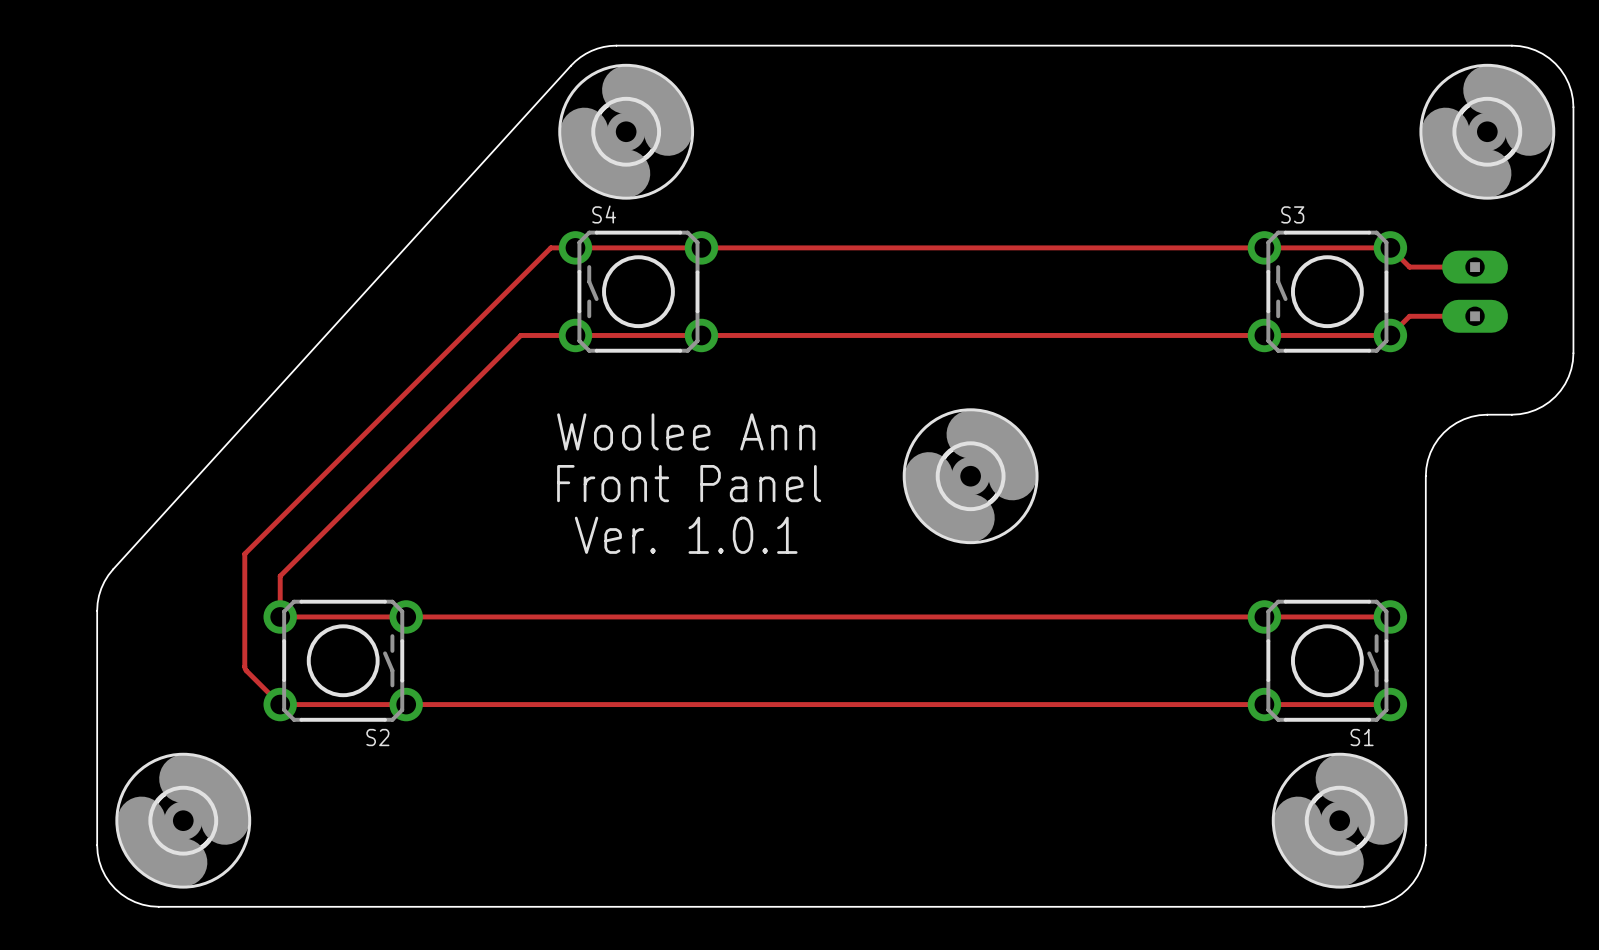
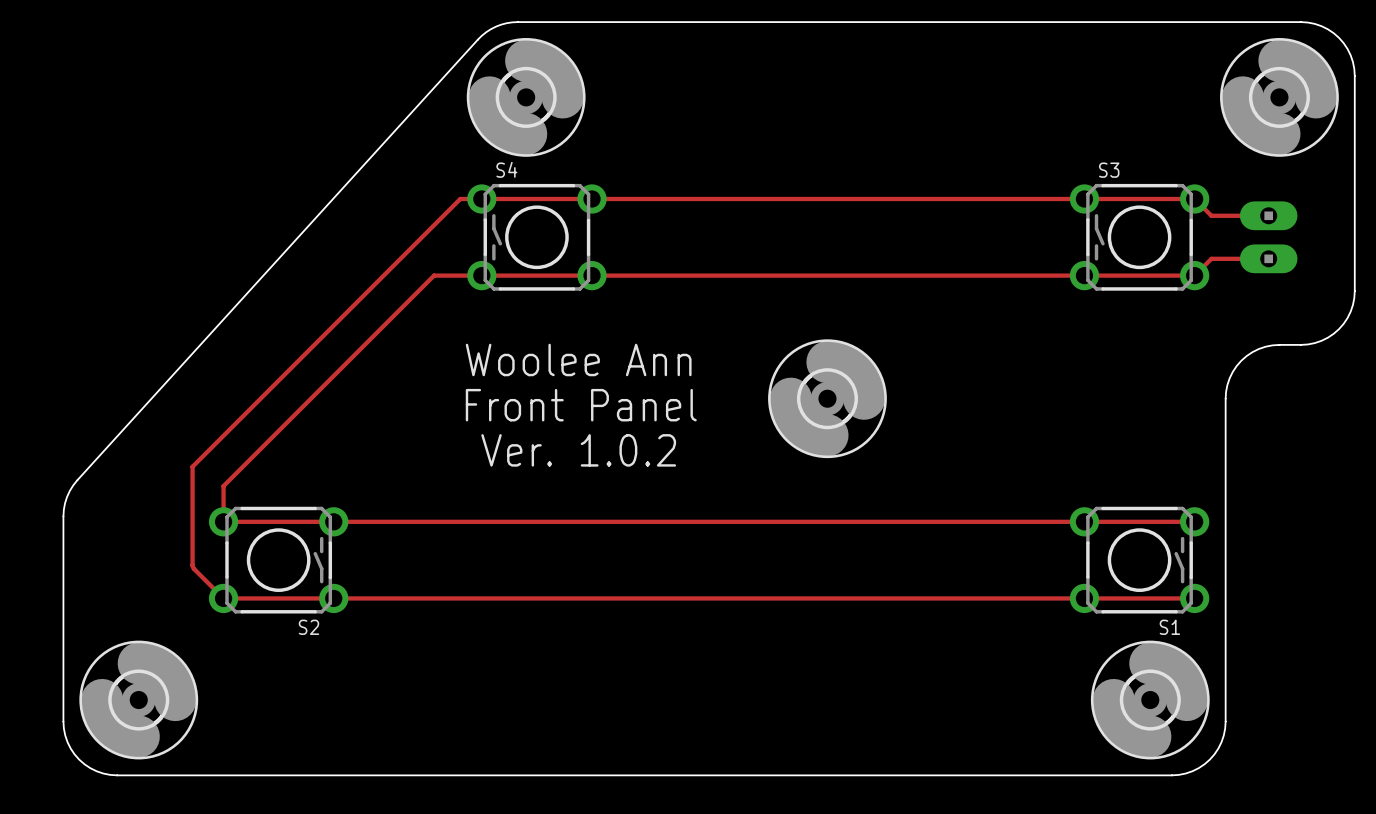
text: Ver. 1.0.1 (686, 535) -> Ver. 1.0.2 (578, 450)

